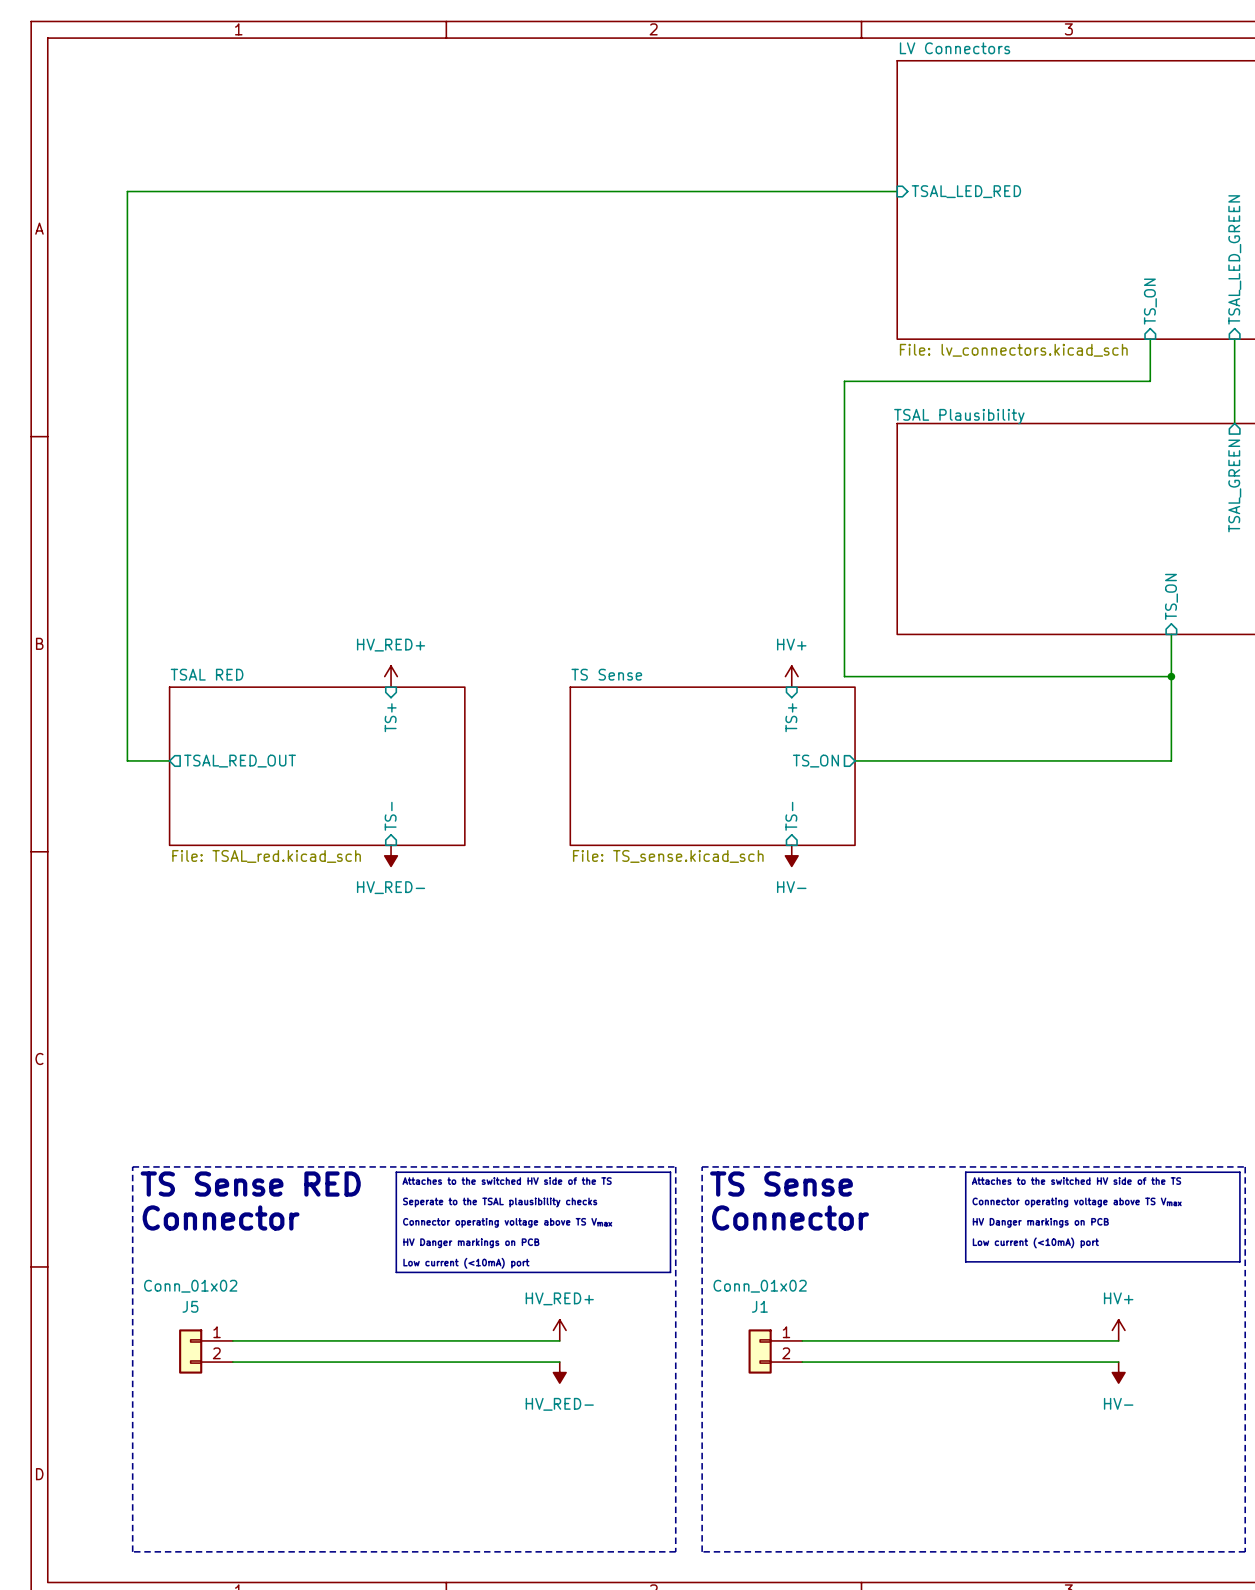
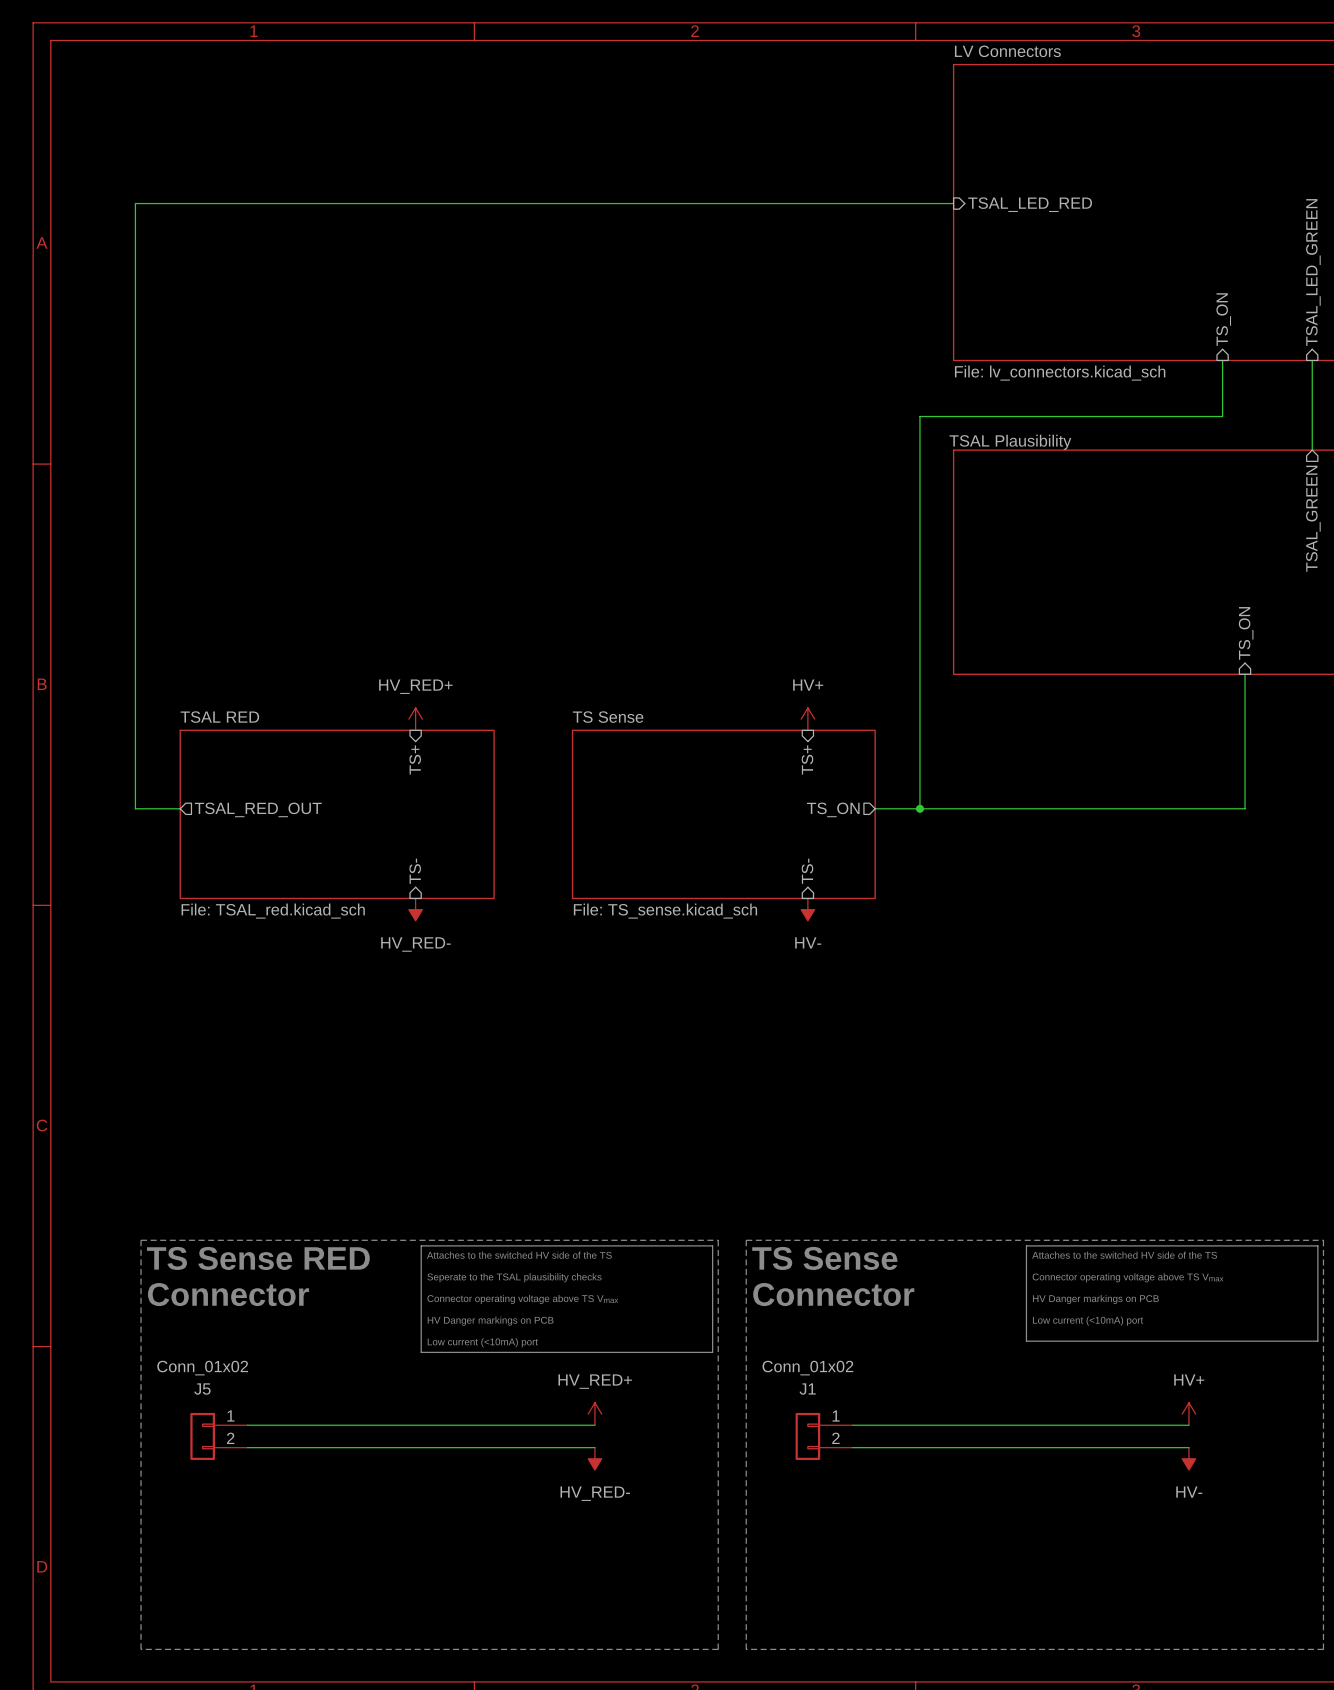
wire: (1150, 381) (844, 381) (844, 676) (1171, 676) -> (1222, 405) (1222, 416) (919, 416) (919, 808)
power symbol position: HV+ (791, 676) -> HV+ (807, 719)
junction: (1171, 676) -> none
sheet pin position: TS+ (791, 717) -> TS+ (807, 759)
wire: none -> (875, 808) (908, 808)
junction: none -> (919, 808)
sheet pin position: TS_ON (815, 761) -> TS_ON (833, 809)
sheet TS Sense position: (712, 766) -> (723, 814)
sheet pin position: TS- (791, 816) -> TS- (807, 871)
power symbol position: HV- (791, 855) -> HV- (807, 909)

